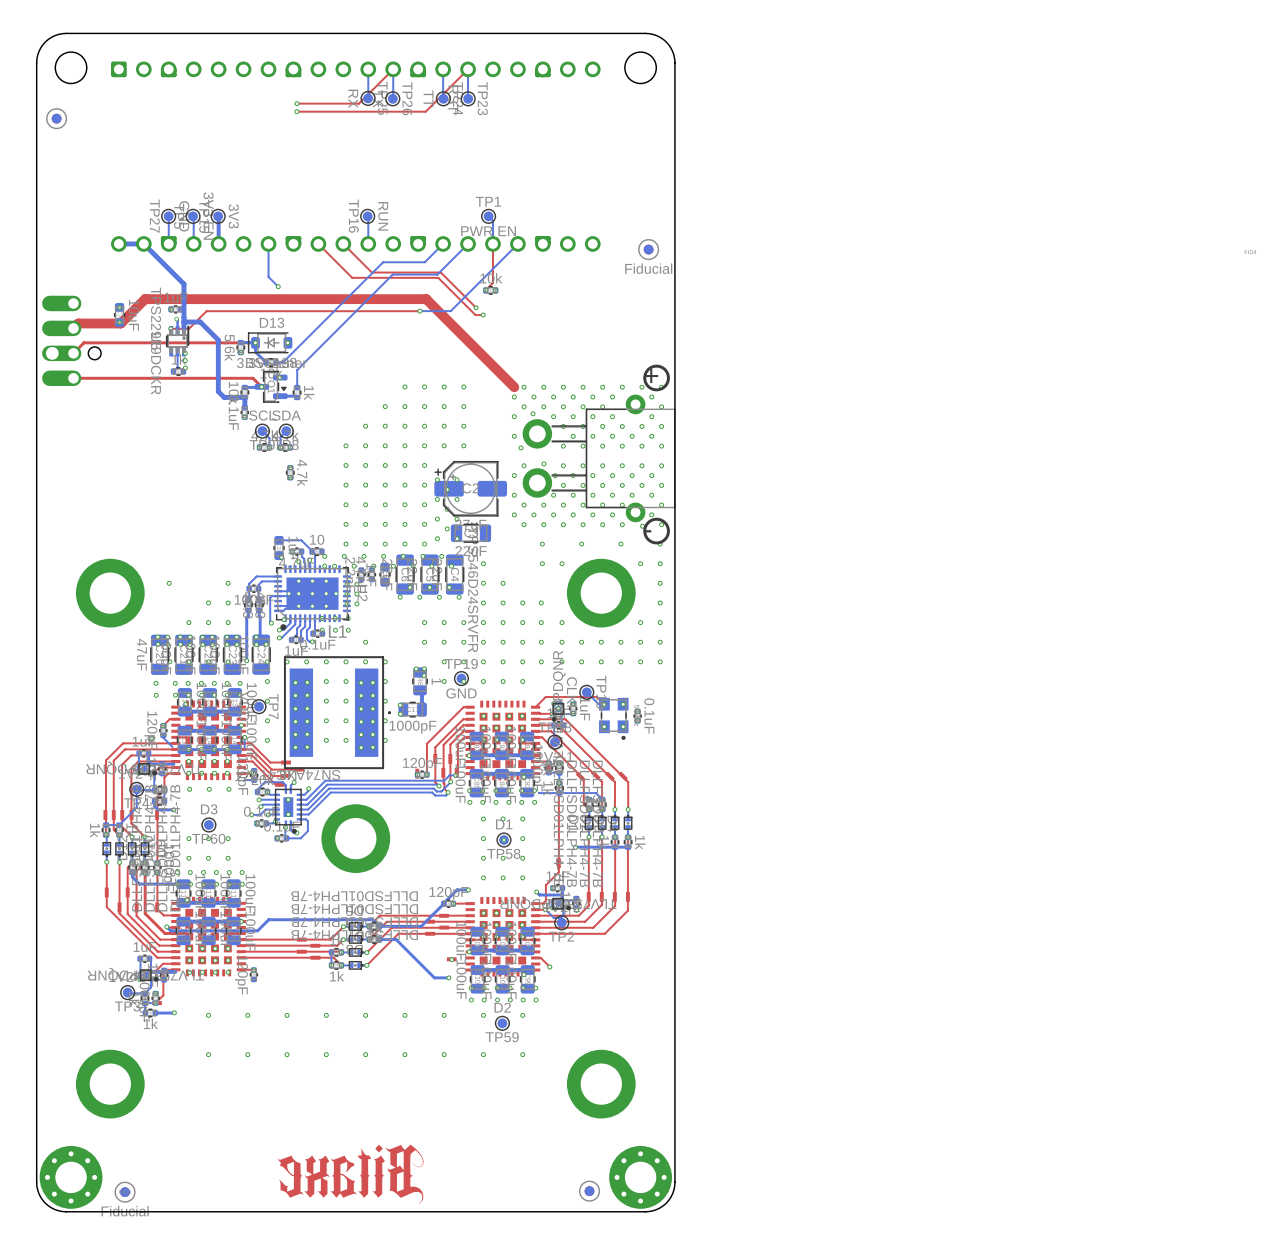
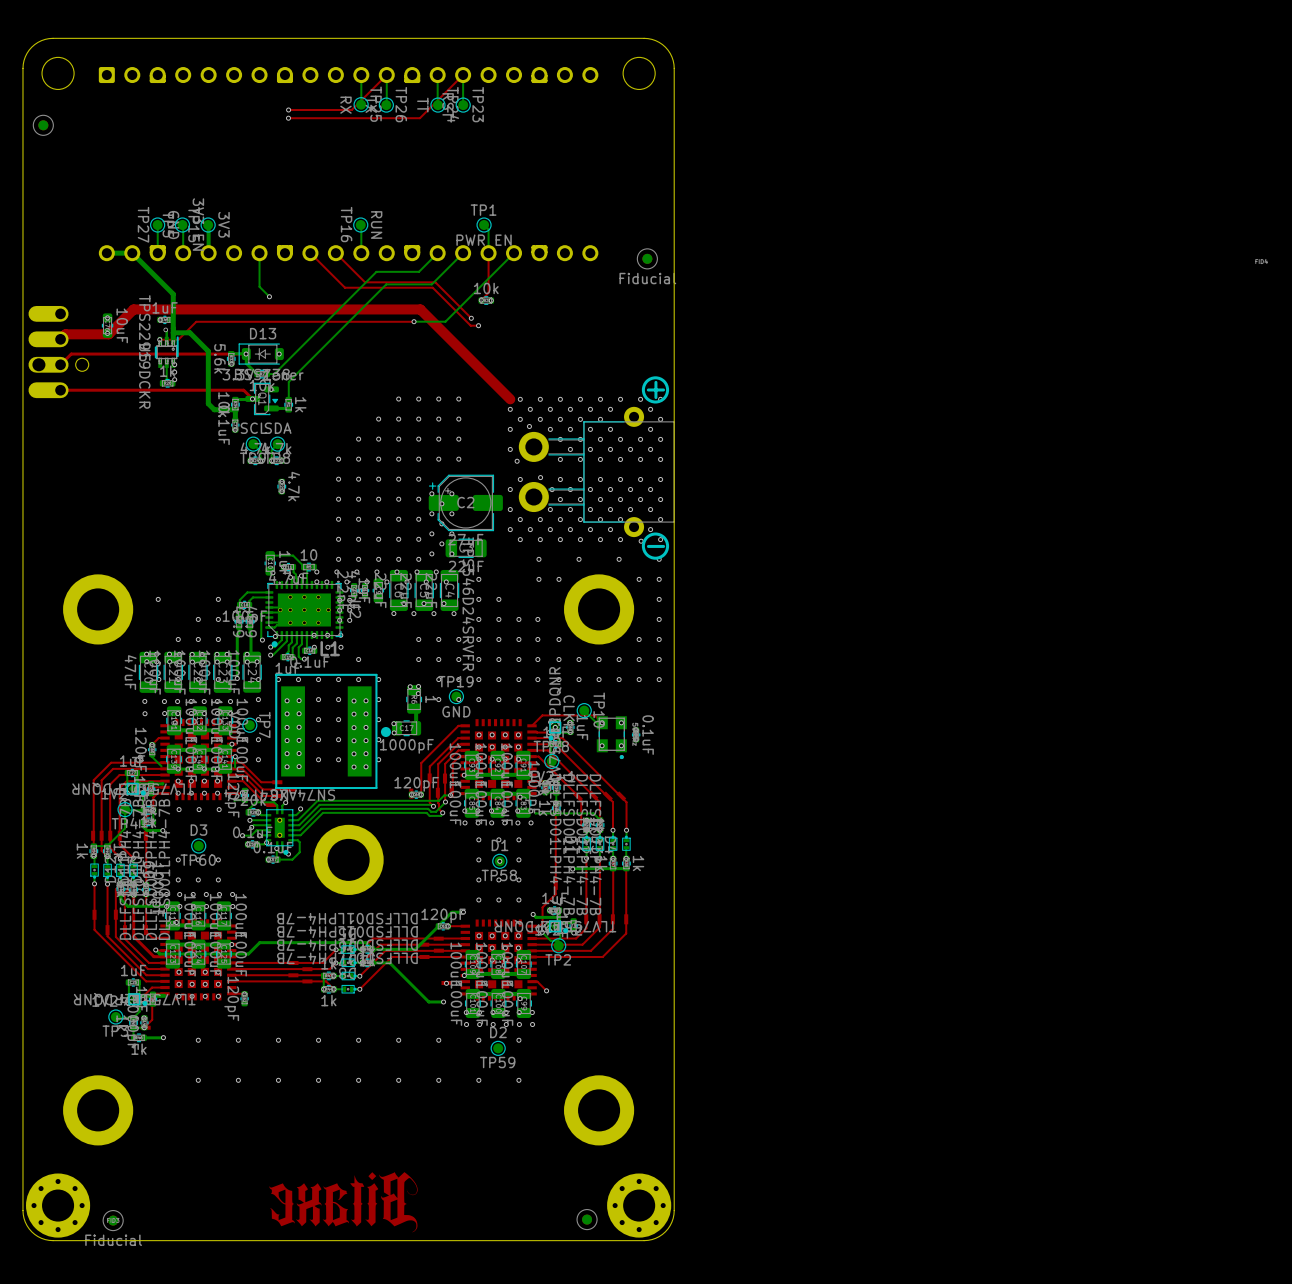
L1 footprint: [283, 656, 391, 770] -> [275, 673, 391, 790]

